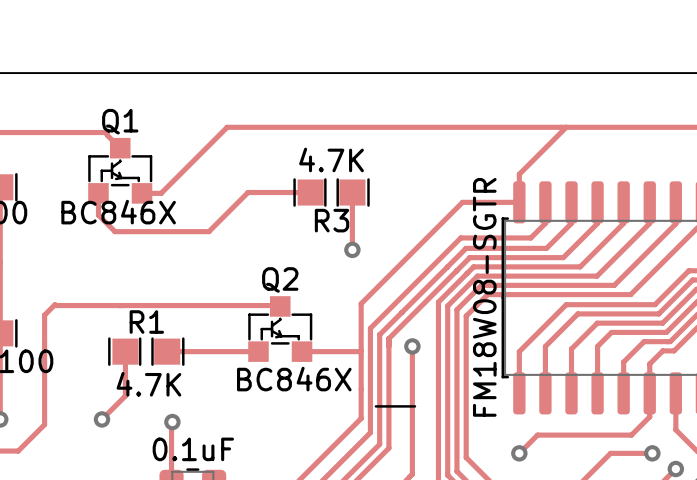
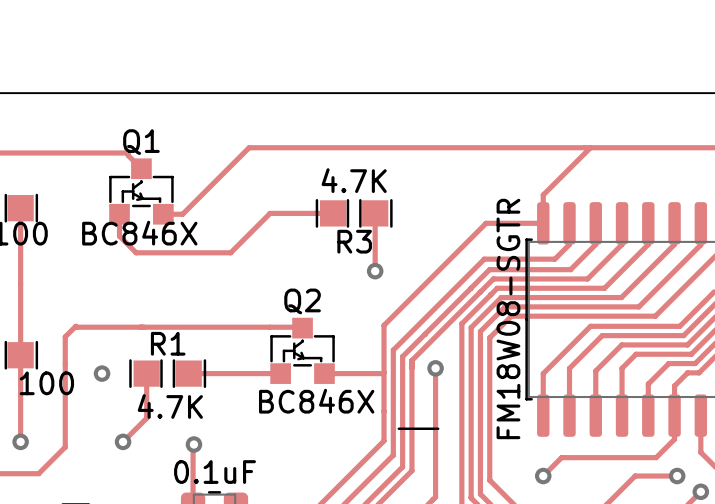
via: none -> (102, 373)

